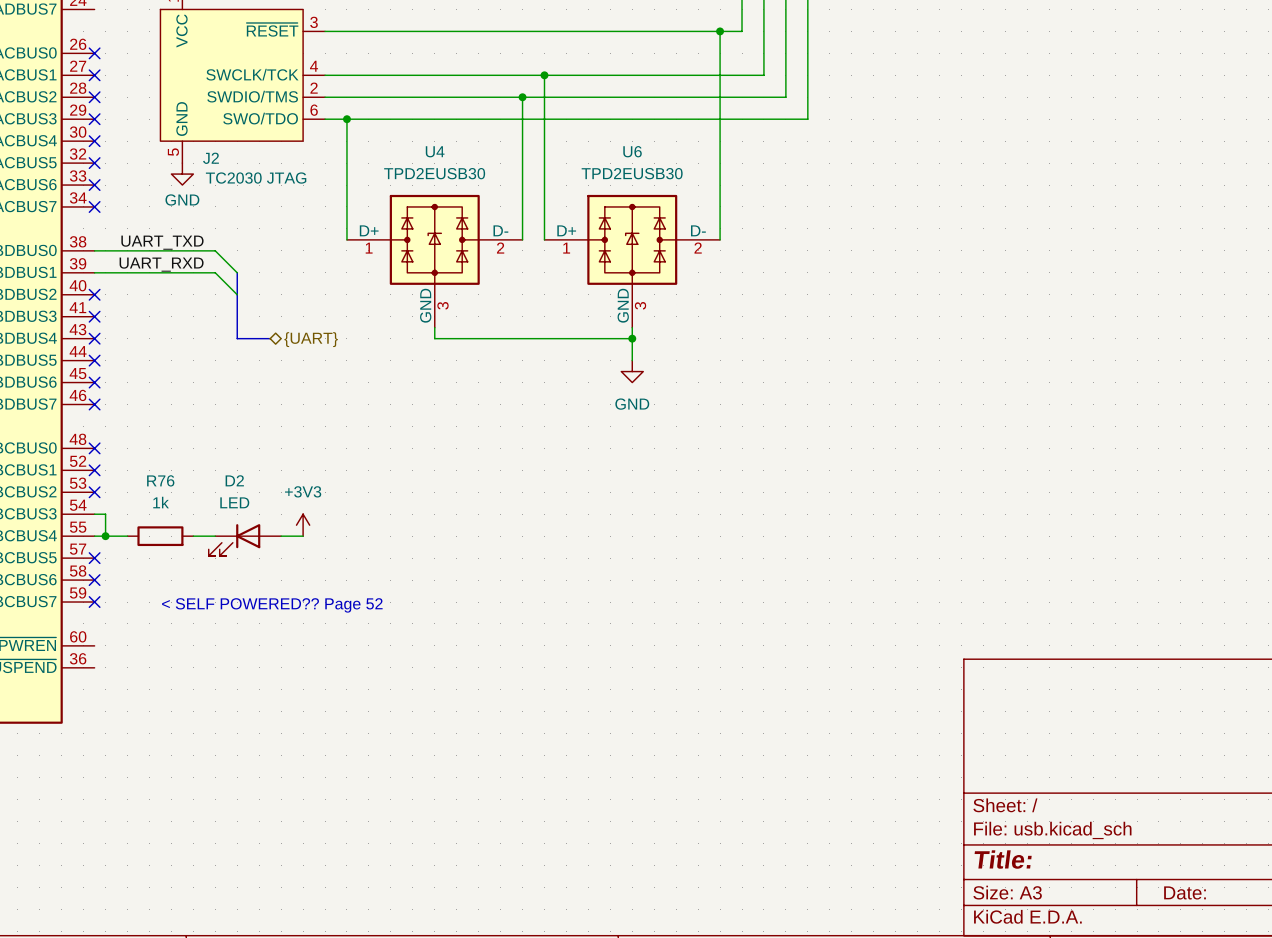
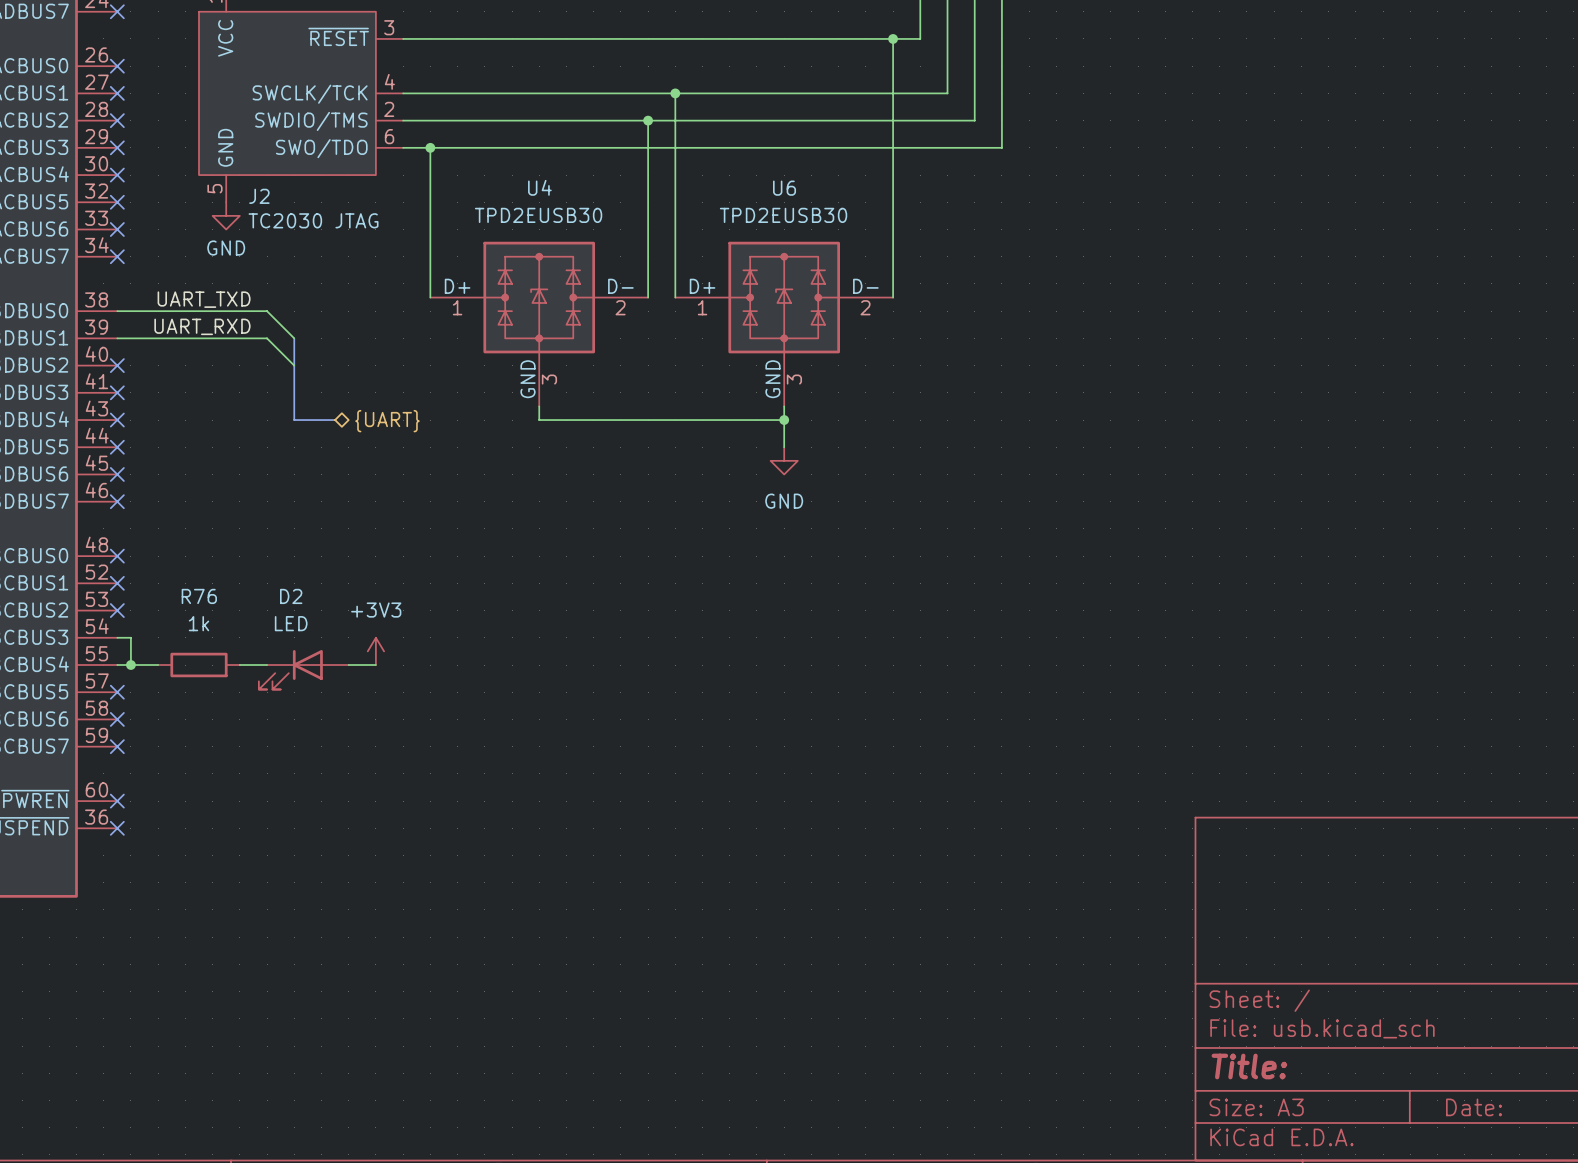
no-connect mark: none -> (117, 11)
text: < SELF POWERED?? Page 52 (272, 605) -> none
no-connect mark: none -> (117, 801)
no-connect mark: none -> (117, 828)

